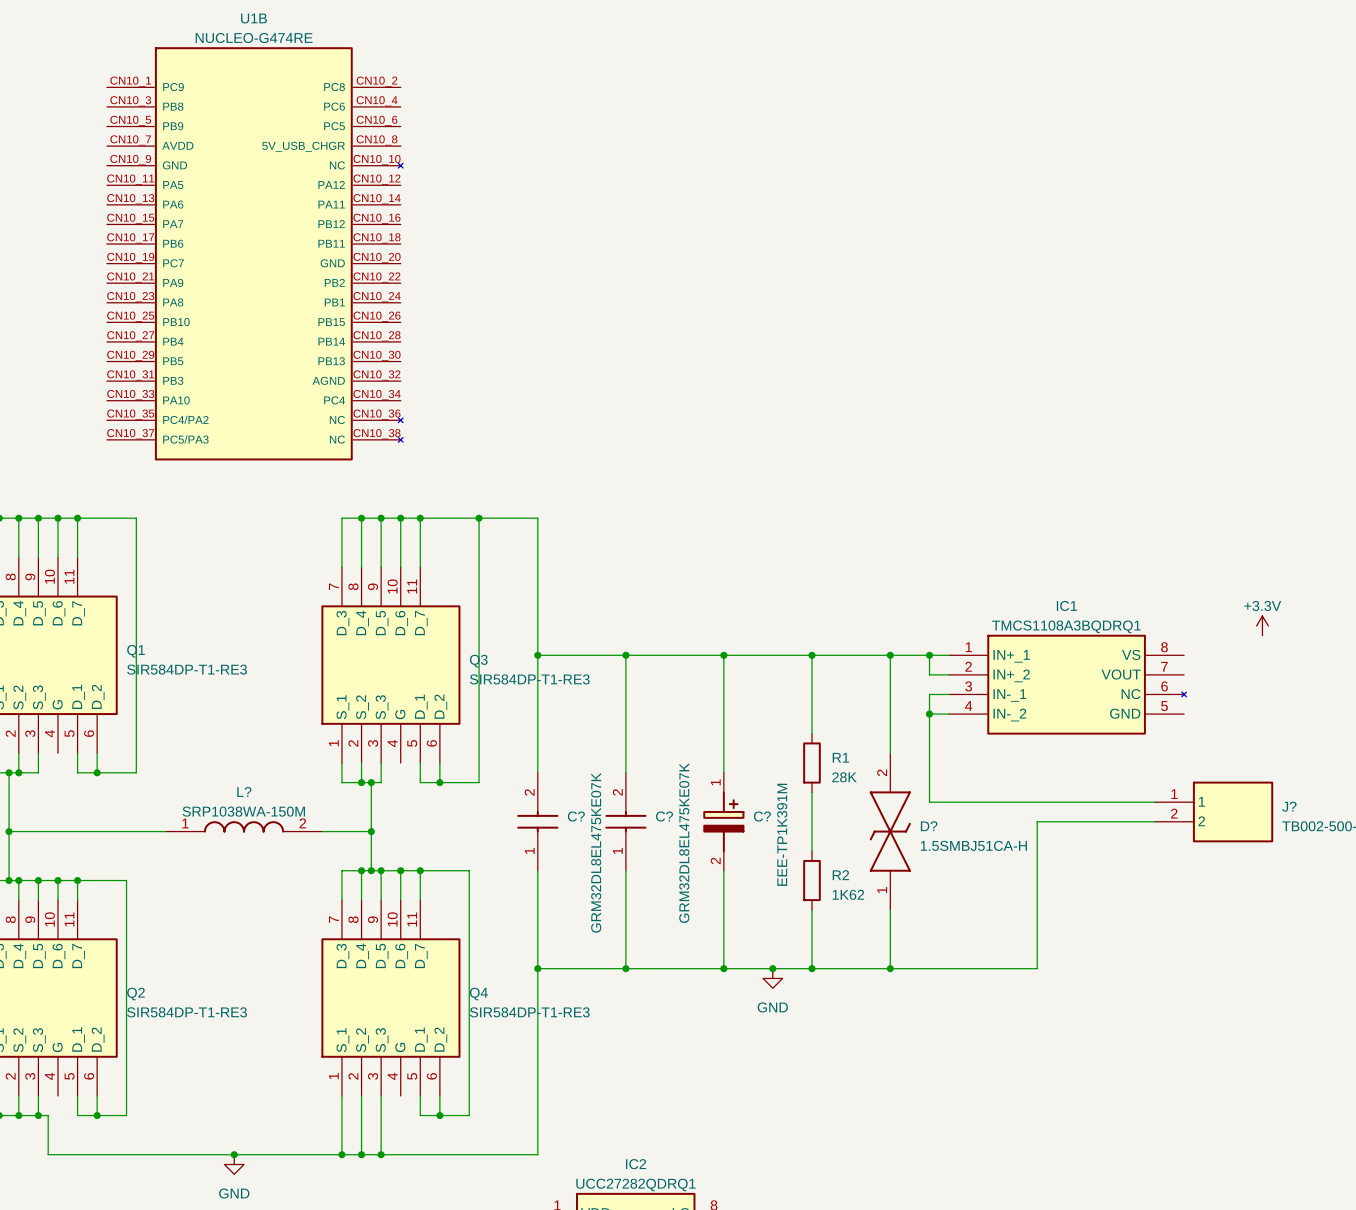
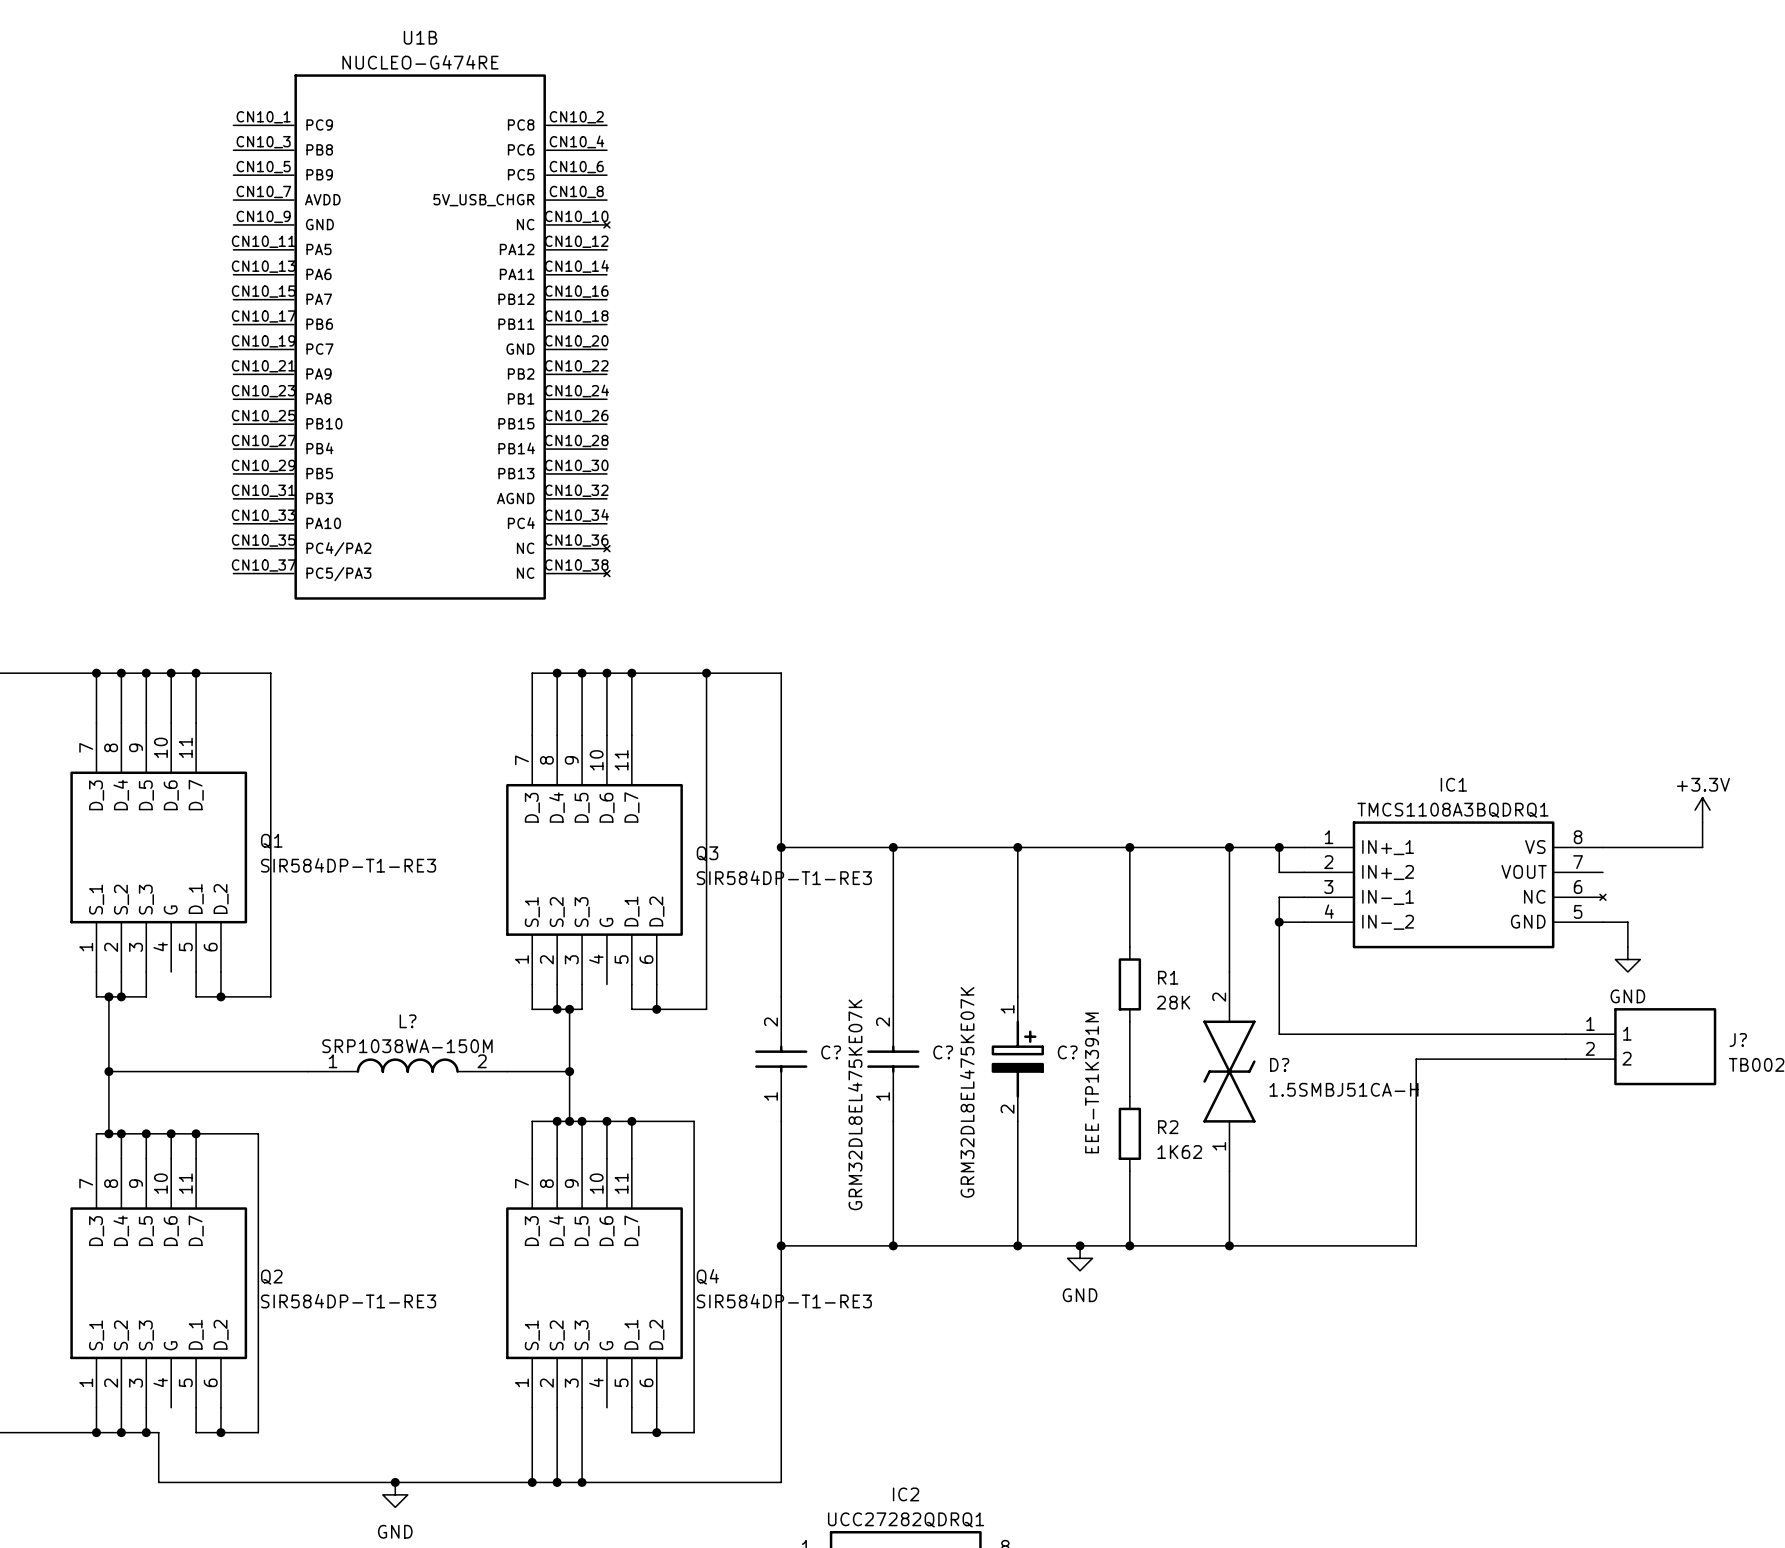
wire: none -> (1702, 822) (1702, 847) (1602, 847)
wire: none -> (1602, 922) (1627, 922) (1627, 947)
power symbol: none -> GND (1627, 959)

